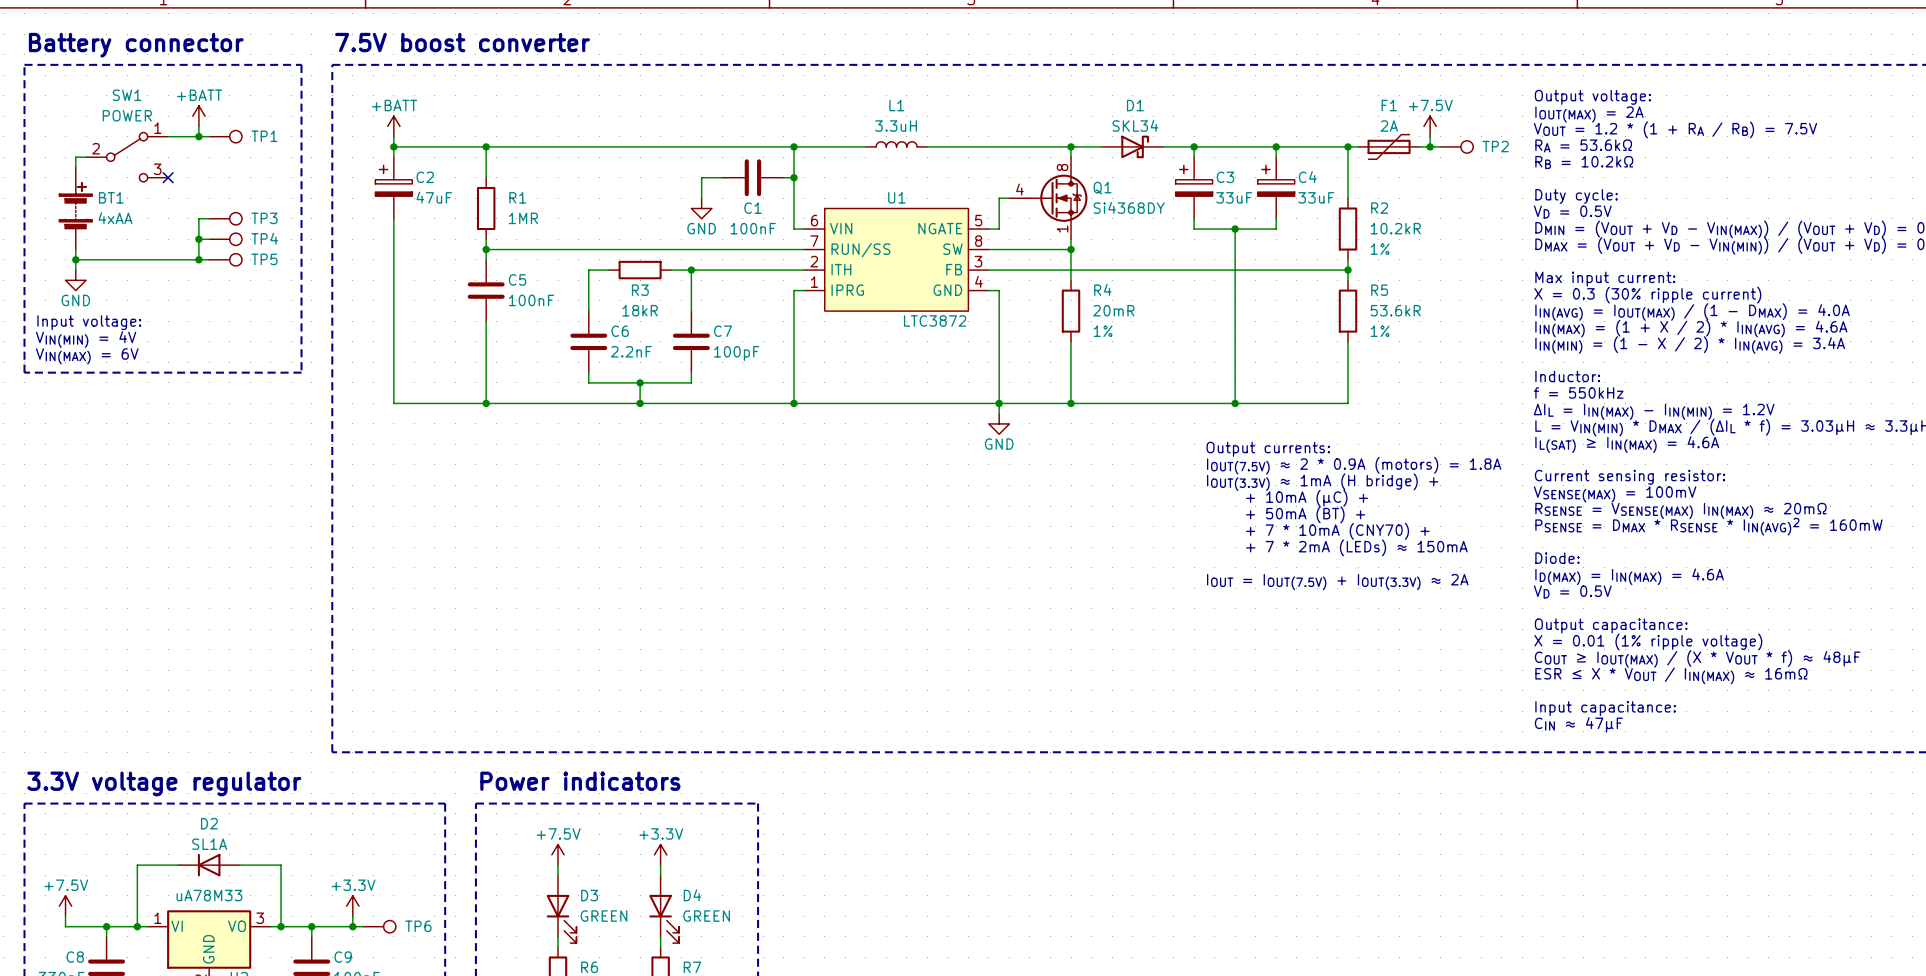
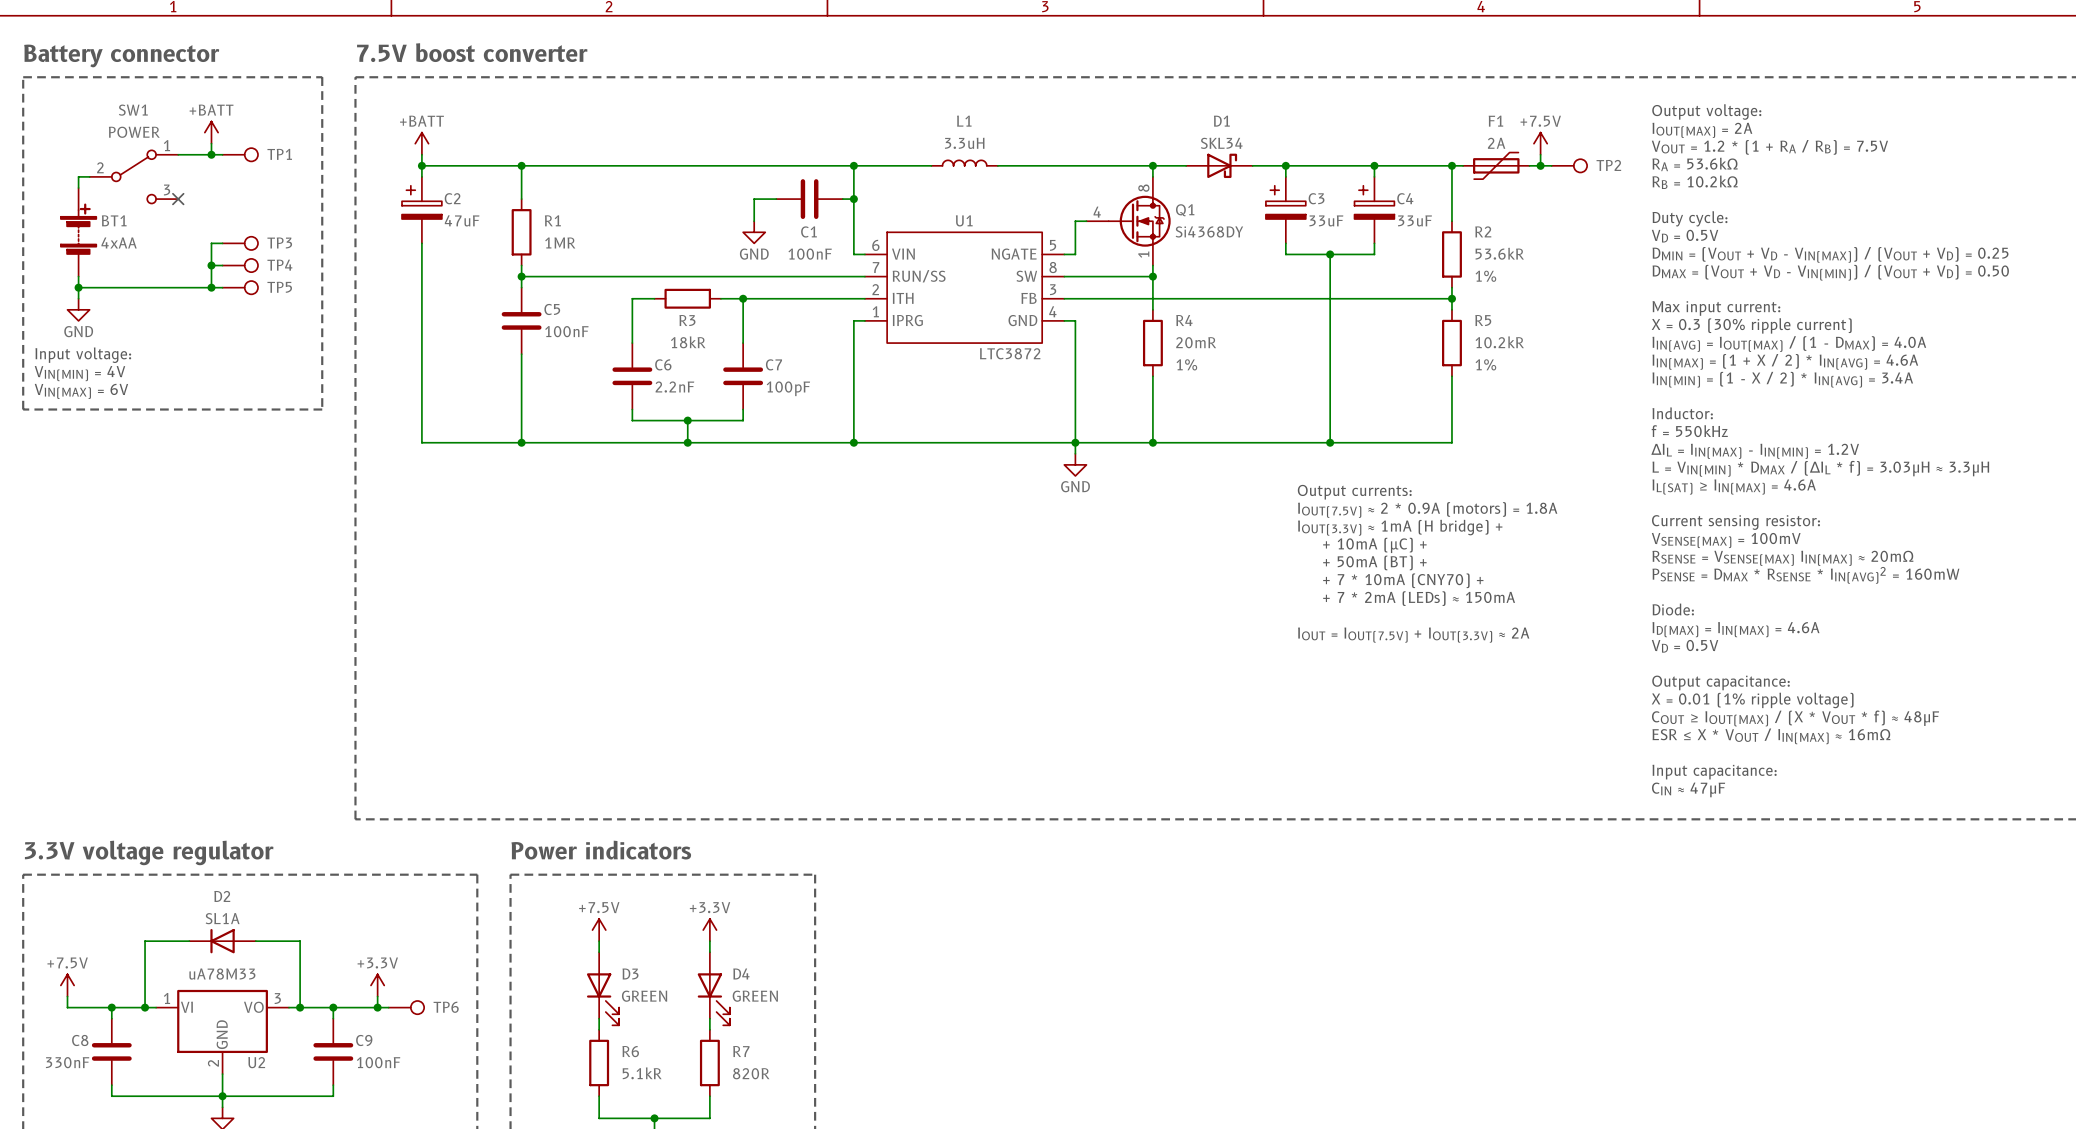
R2 value: 10.2kR (1395, 228) -> 53.6kR (1499, 253)
R5 value: 53.6kR (1395, 310) -> 10.2kR (1499, 342)

